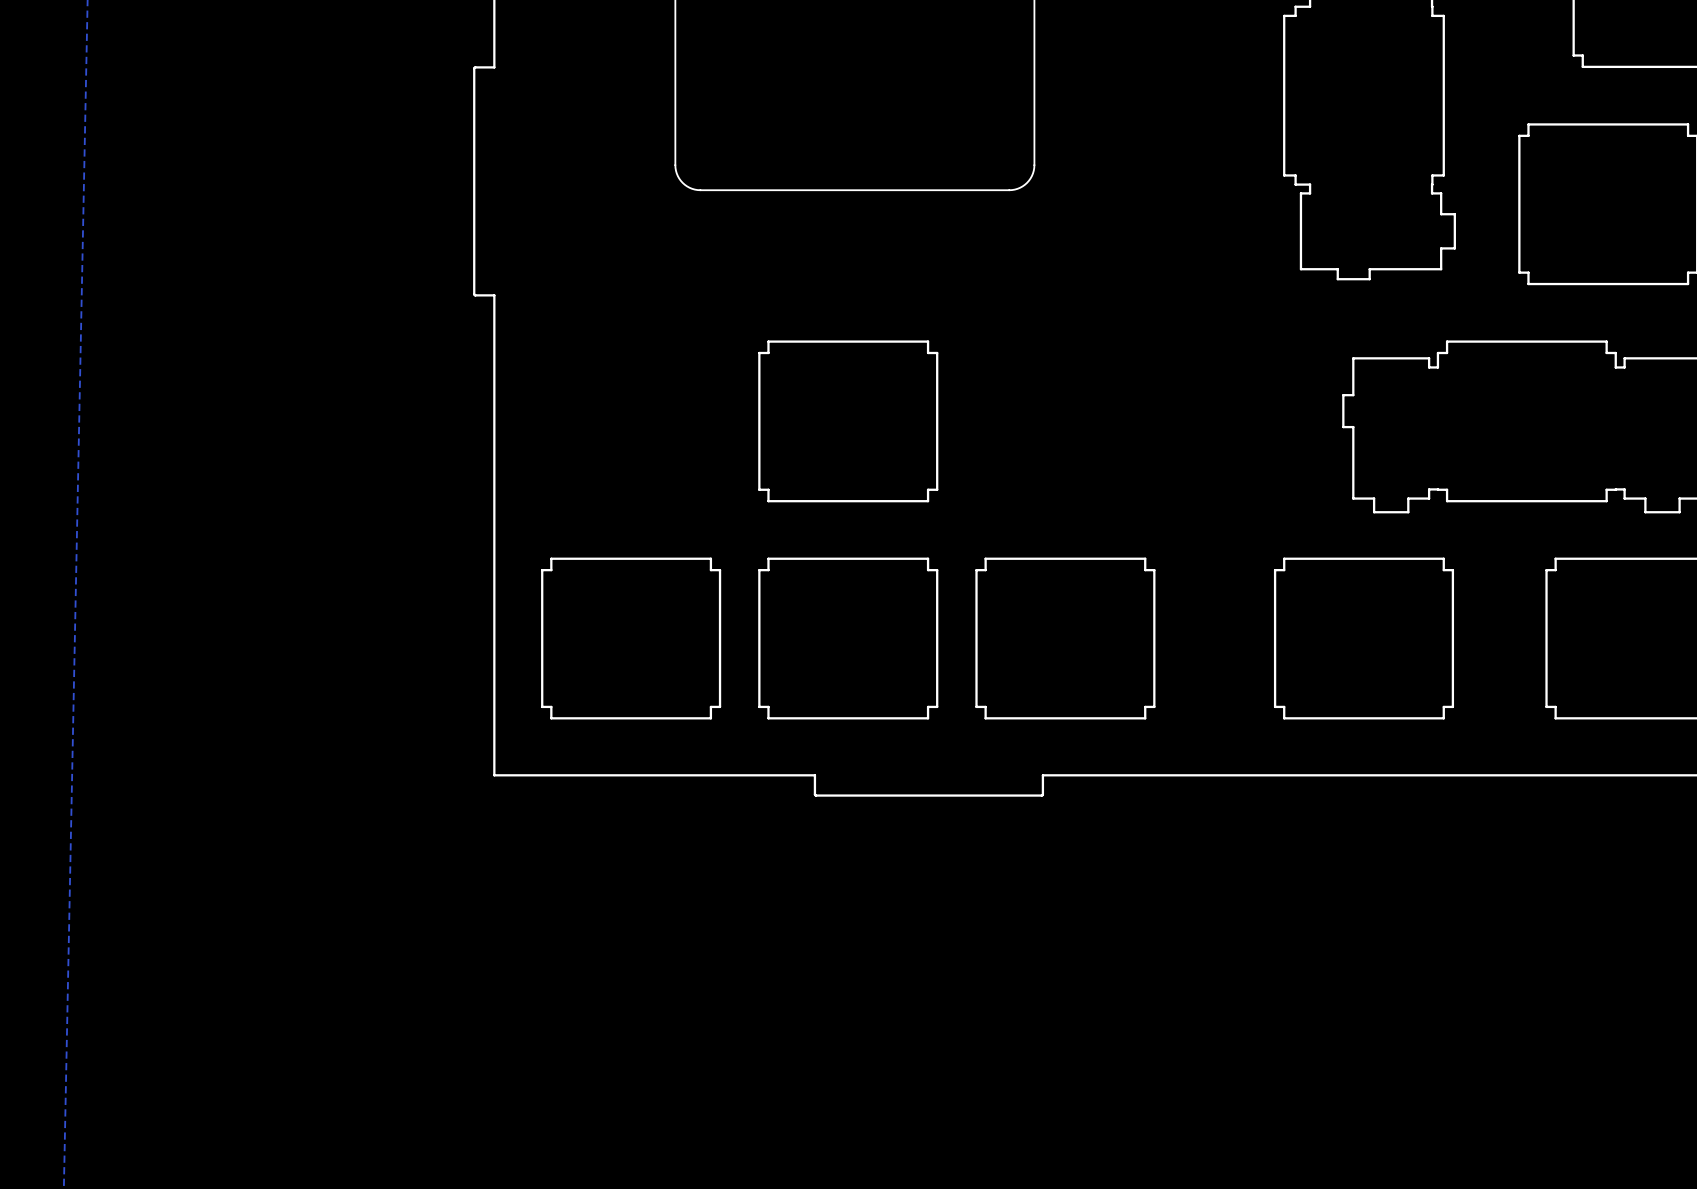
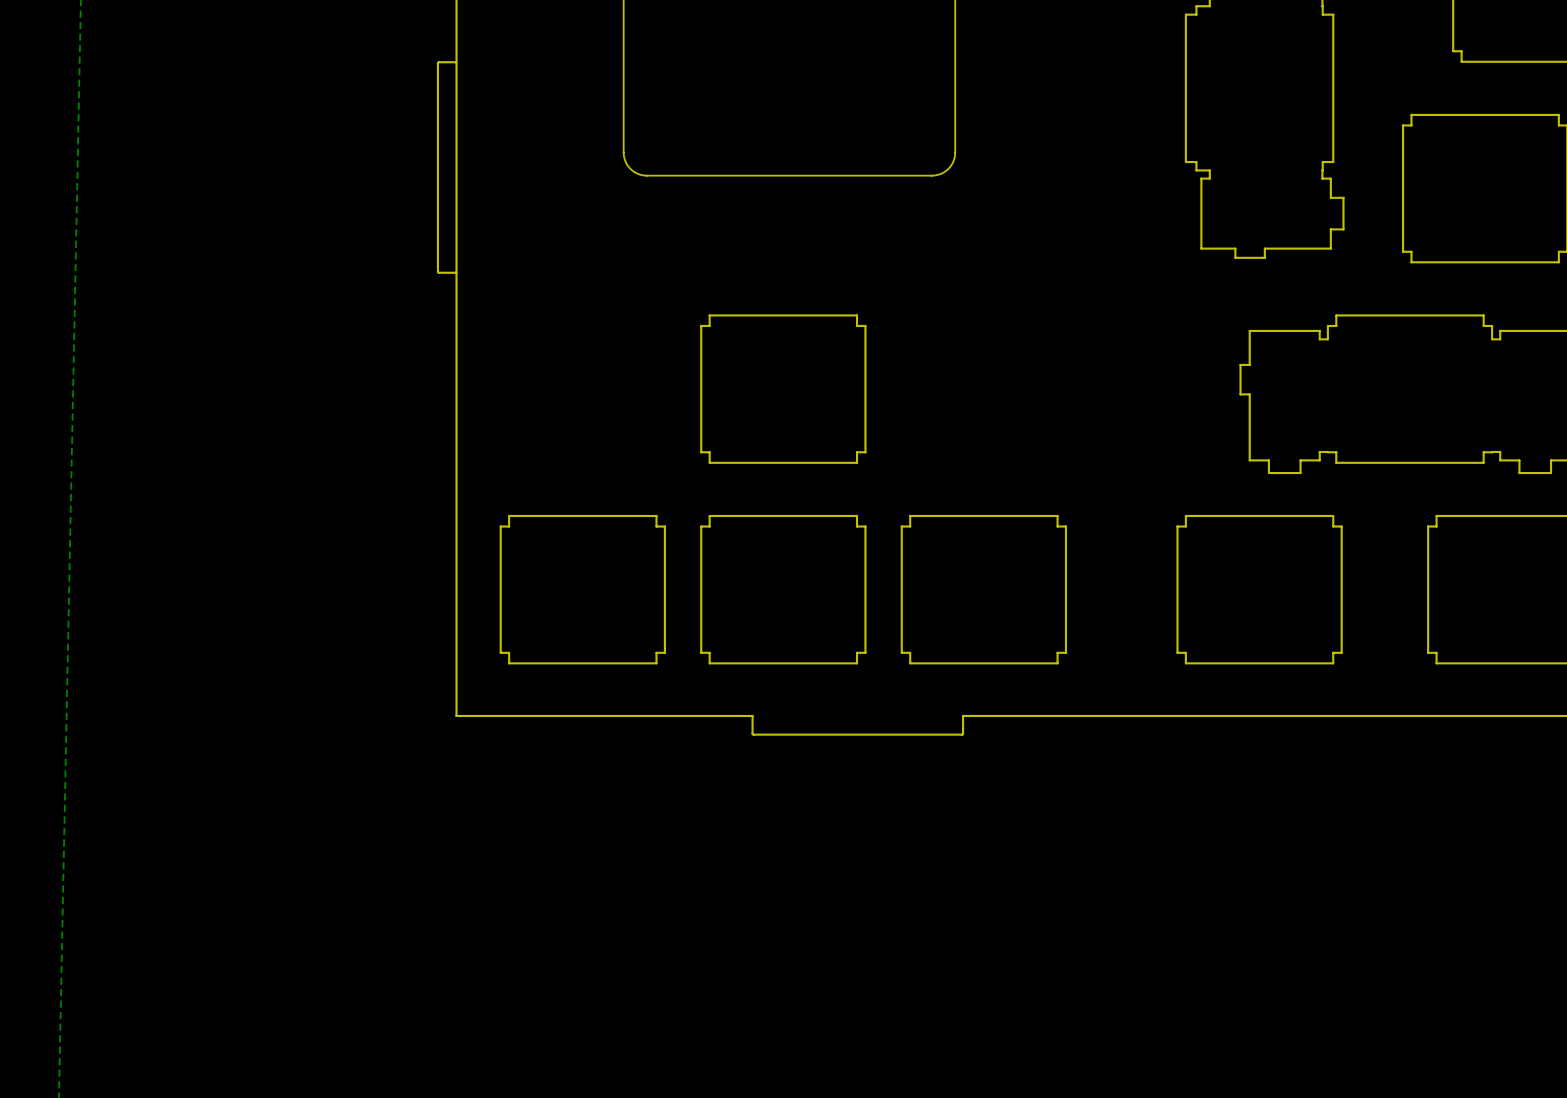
board edge: none -> (456, 62) (456, 272)

